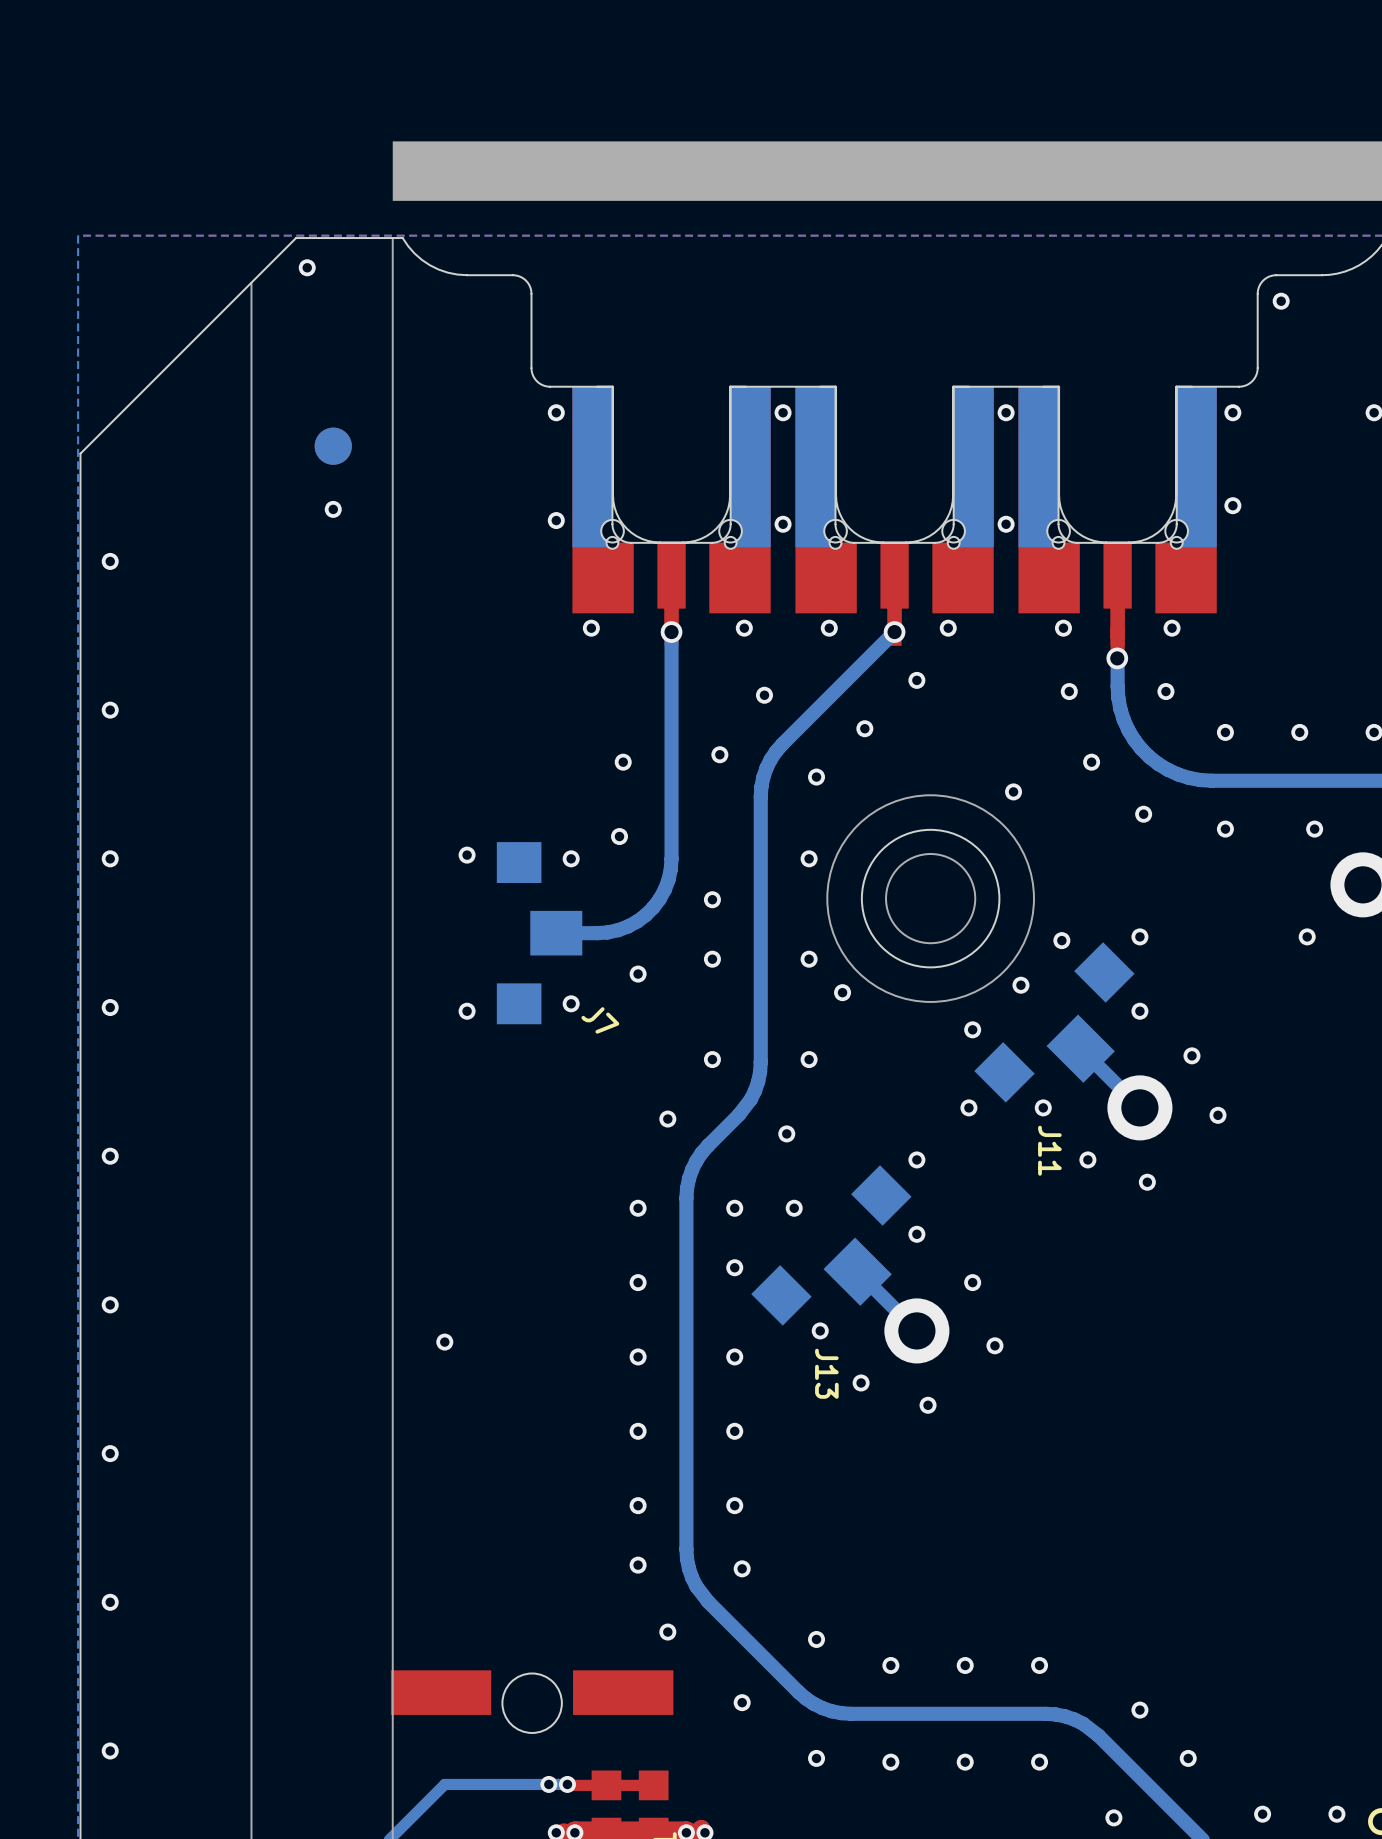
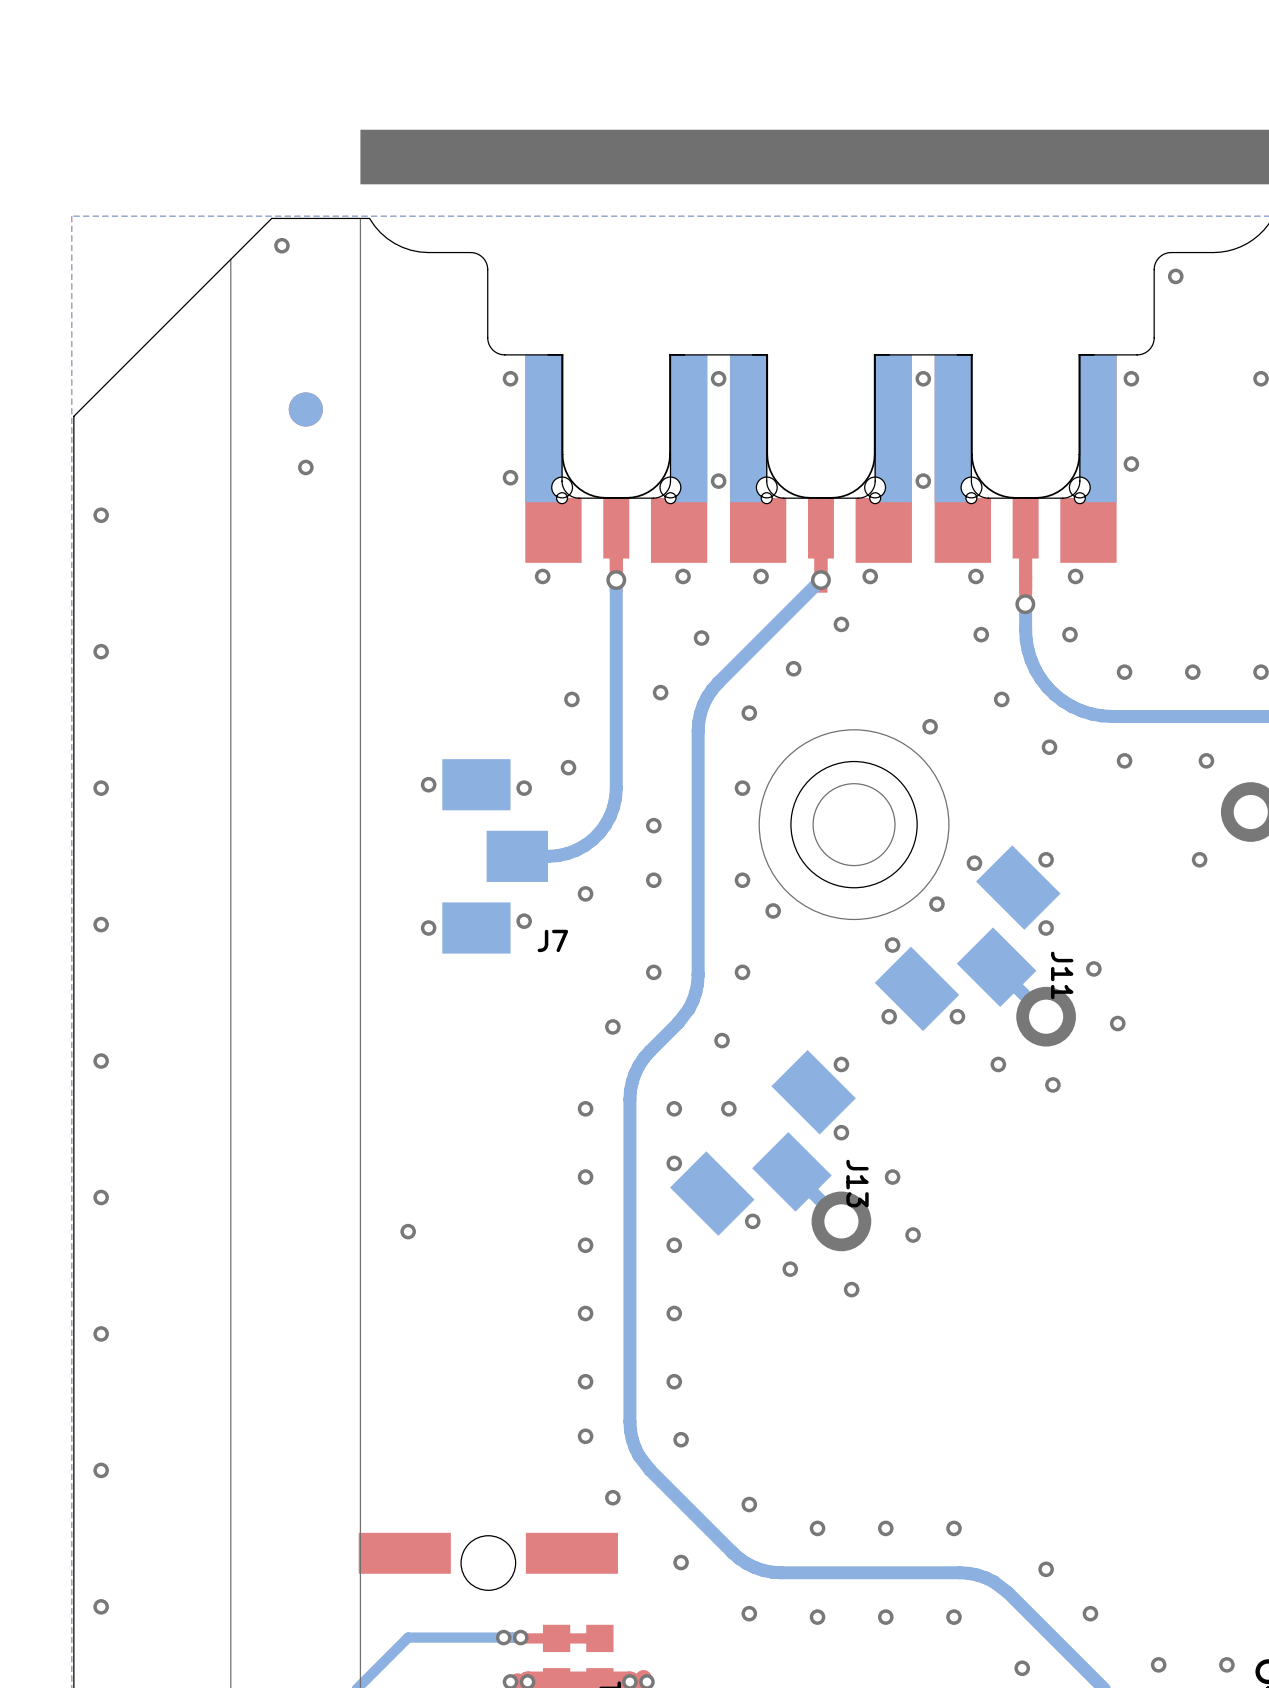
J7 footprint: [496, 842, 583, 1025] -> [442, 759, 549, 954]
J11 footprint: [974, 942, 1135, 1103] -> [874, 845, 1061, 1032]
J7 name rotation: 0° (600, 1020) -> 45° counterclockwise (552, 940)
J11 name position: J11 (1049, 1150) -> J11 (1062, 975)
J13 footprint: [751, 1165, 912, 1326] -> [670, 1050, 856, 1236]
J13 name position: J13 (826, 1373) -> J13 (857, 1183)

